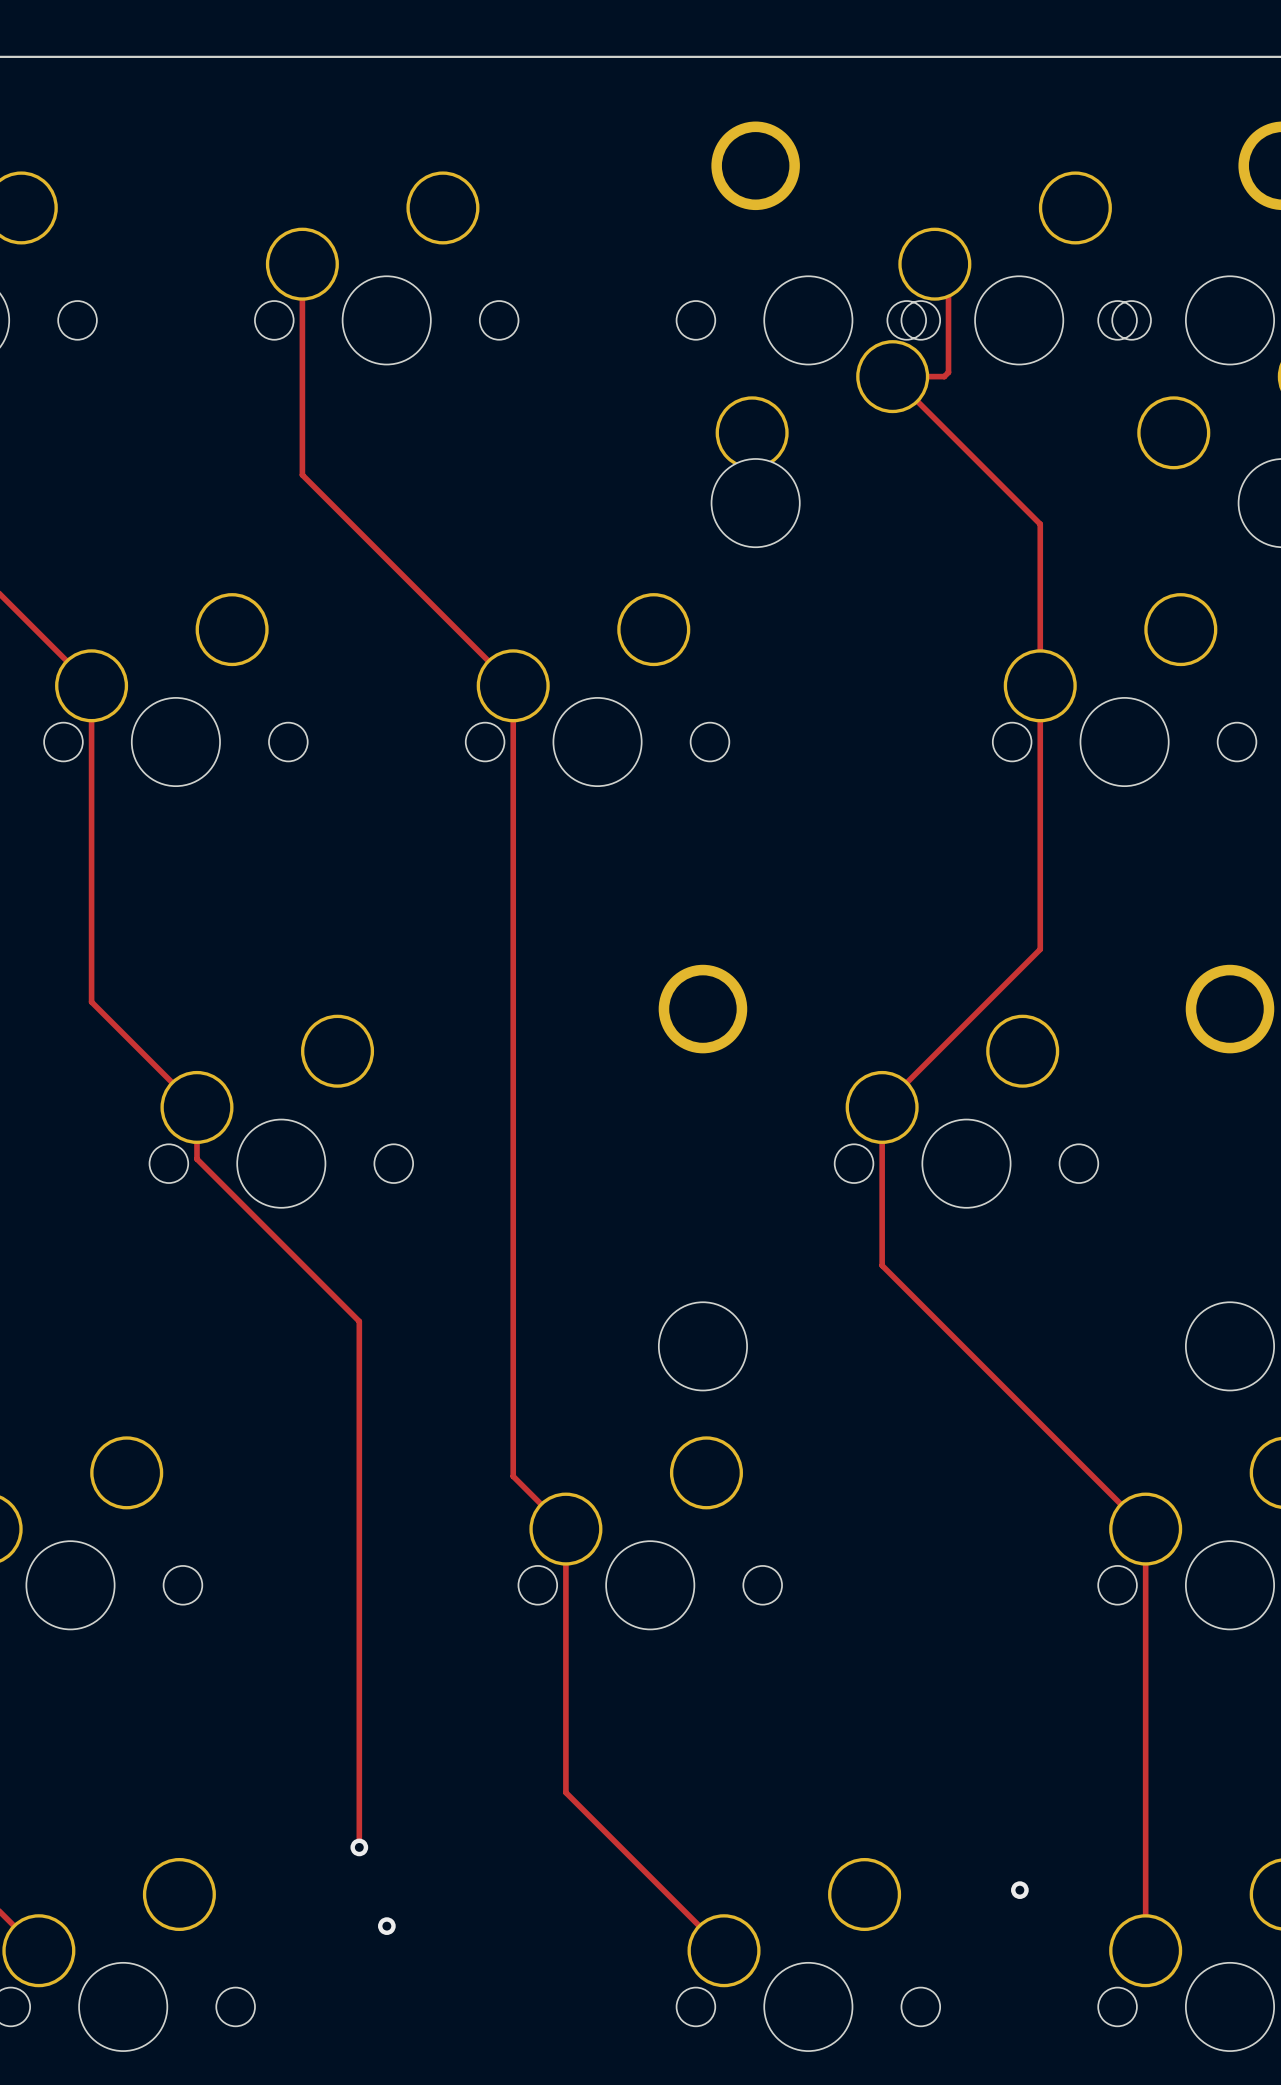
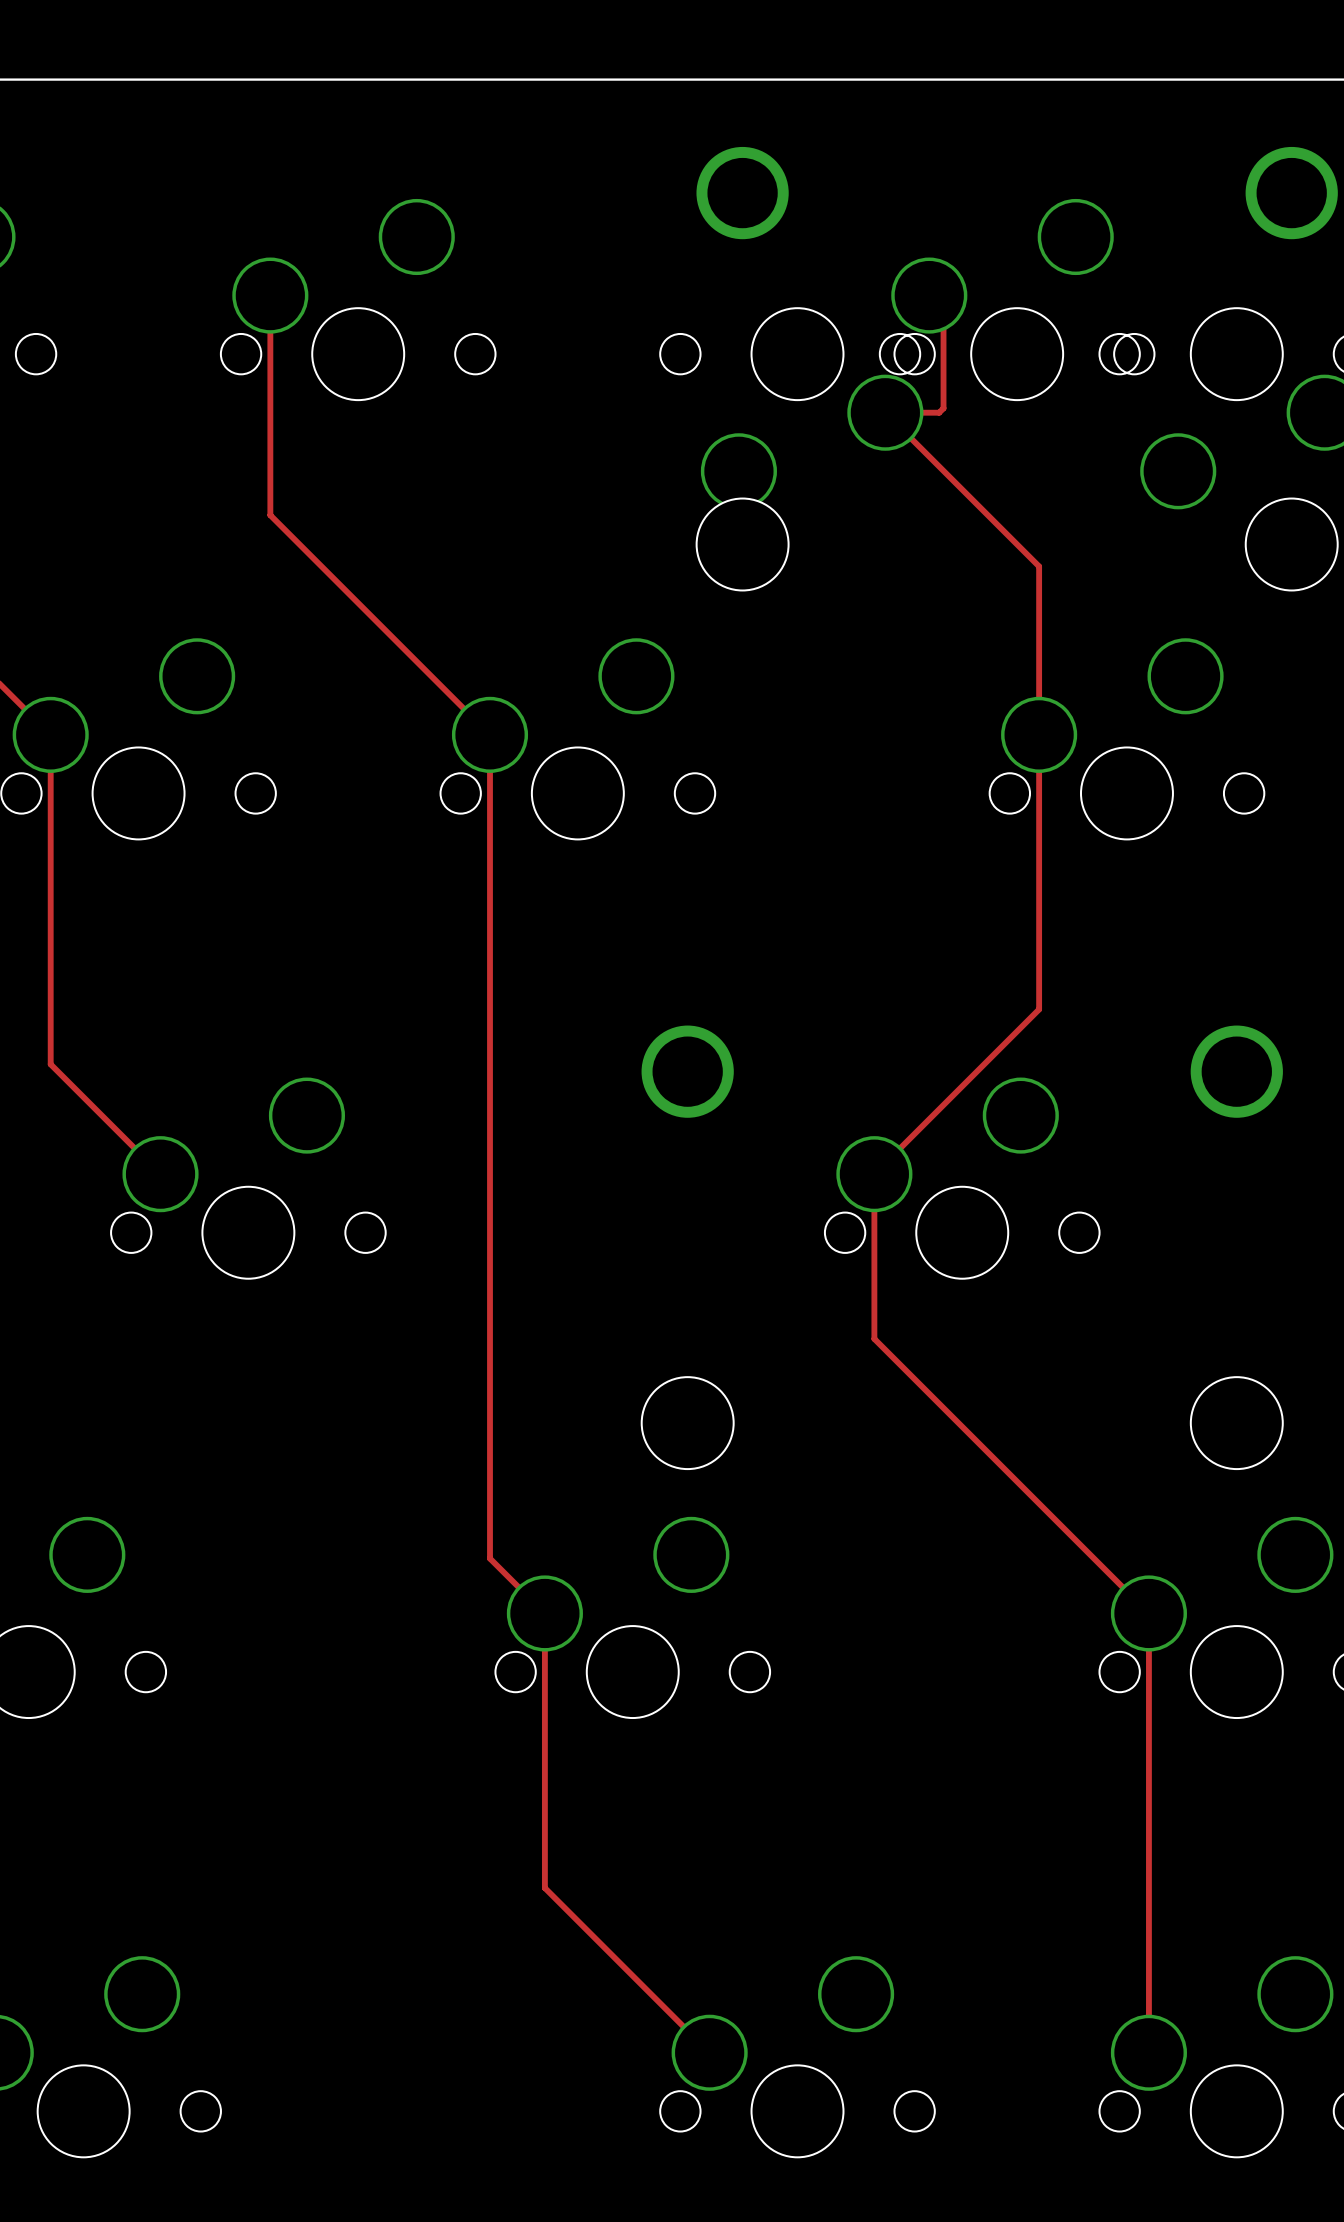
track: (196, 1107) (196, 1159) (359, 1321) (359, 1847) -> none
via: (359, 1847) -> none
via: (1019, 1890) -> none
via: (386, 1926) -> none

